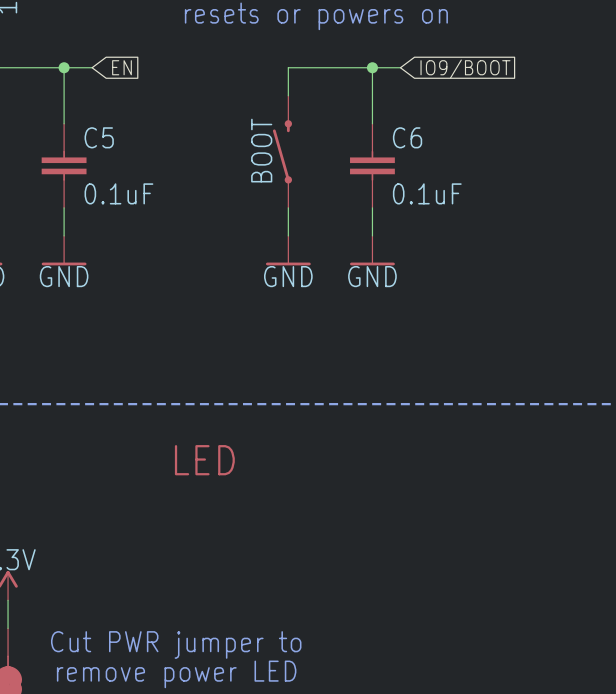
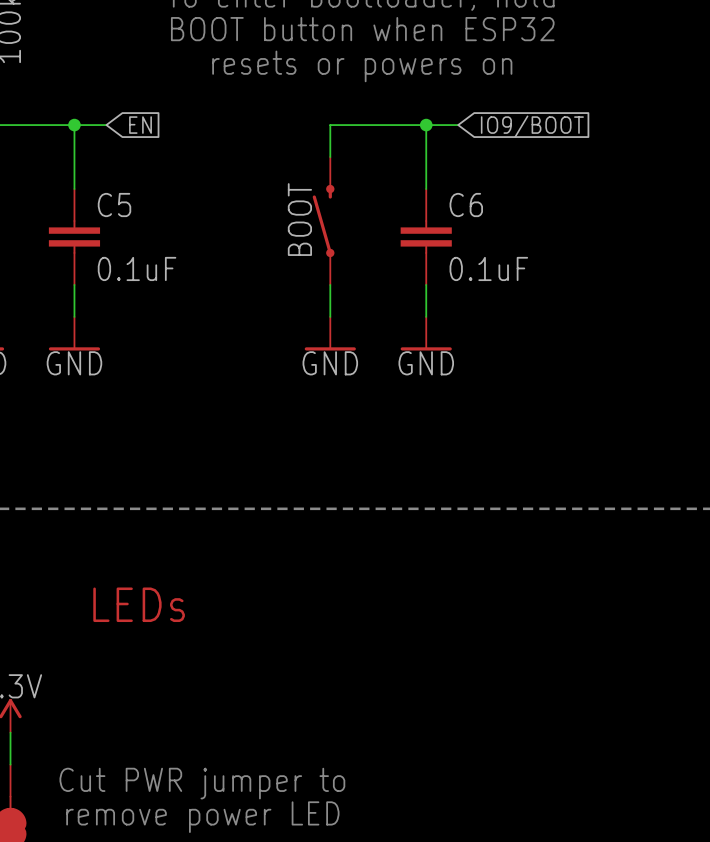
text: LED (204, 460) -> LEDs (139, 604)

